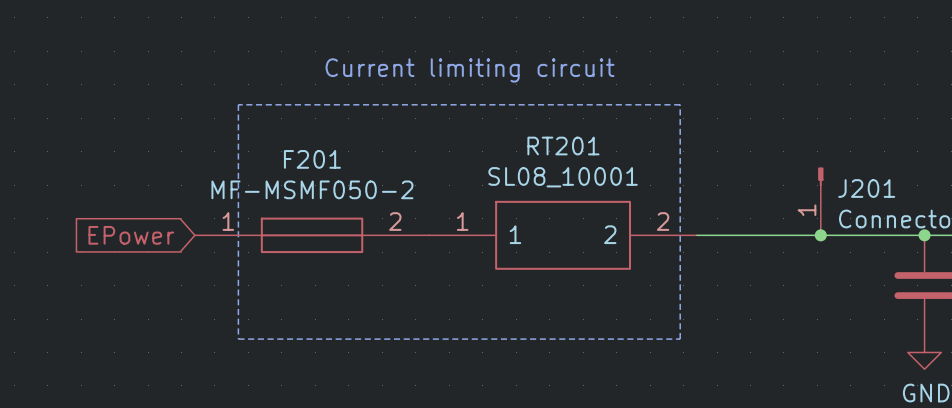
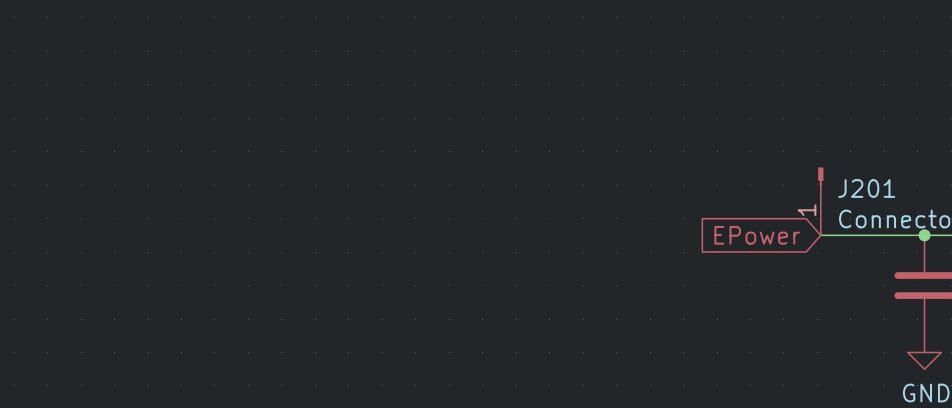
text: Current limiting circuit (470, 70) -> none
line: (238, 104) (238, 339) (680, 339) (680, 104) (238, 104) -> none
global label: EPower (131, 235) -> none
F201: MF-MSMF050-2 (312, 235) -> none
RT201: SL08_10001 (563, 235) -> none
wire: (696, 235) (820, 235) -> none
global label: none -> EPower (757, 235)
junction: (820, 235) -> none

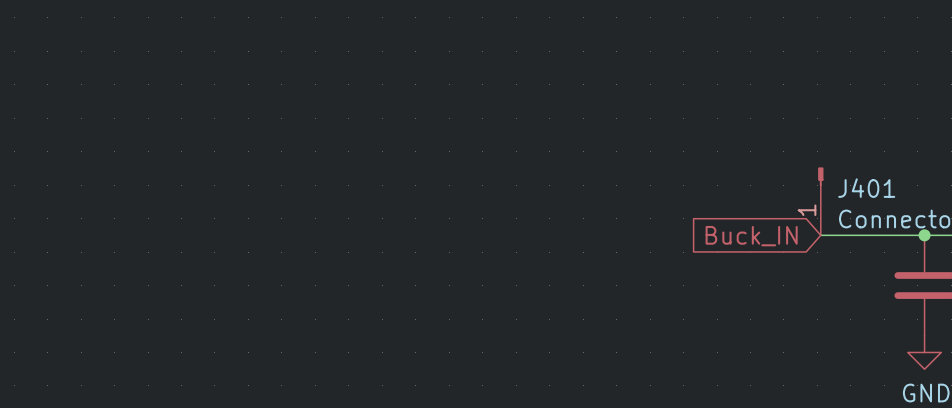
J201 name: J201 (866, 188) -> J401 (866, 188)
global label: EPower (757, 235) -> Buck_IN (751, 236)

